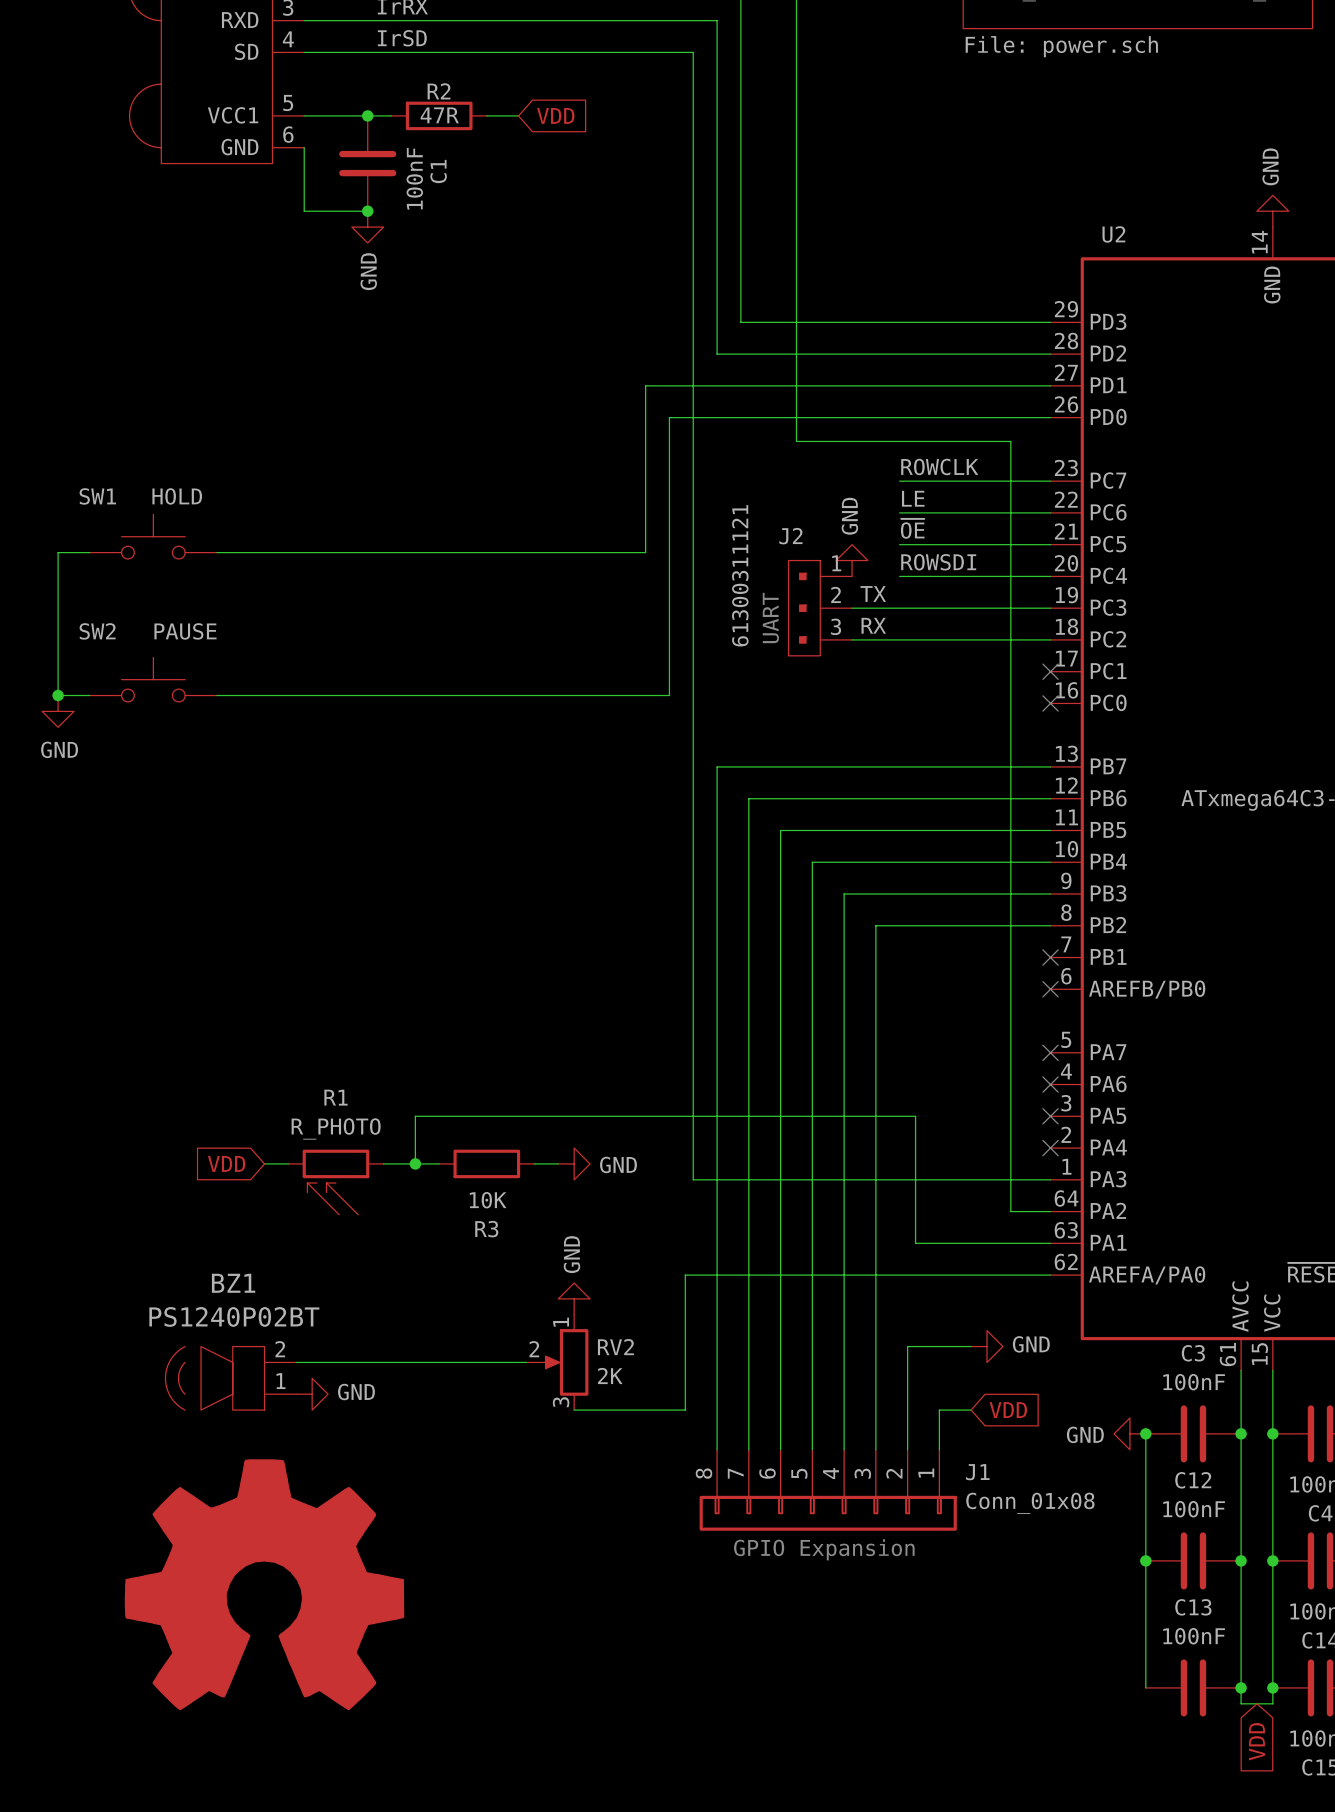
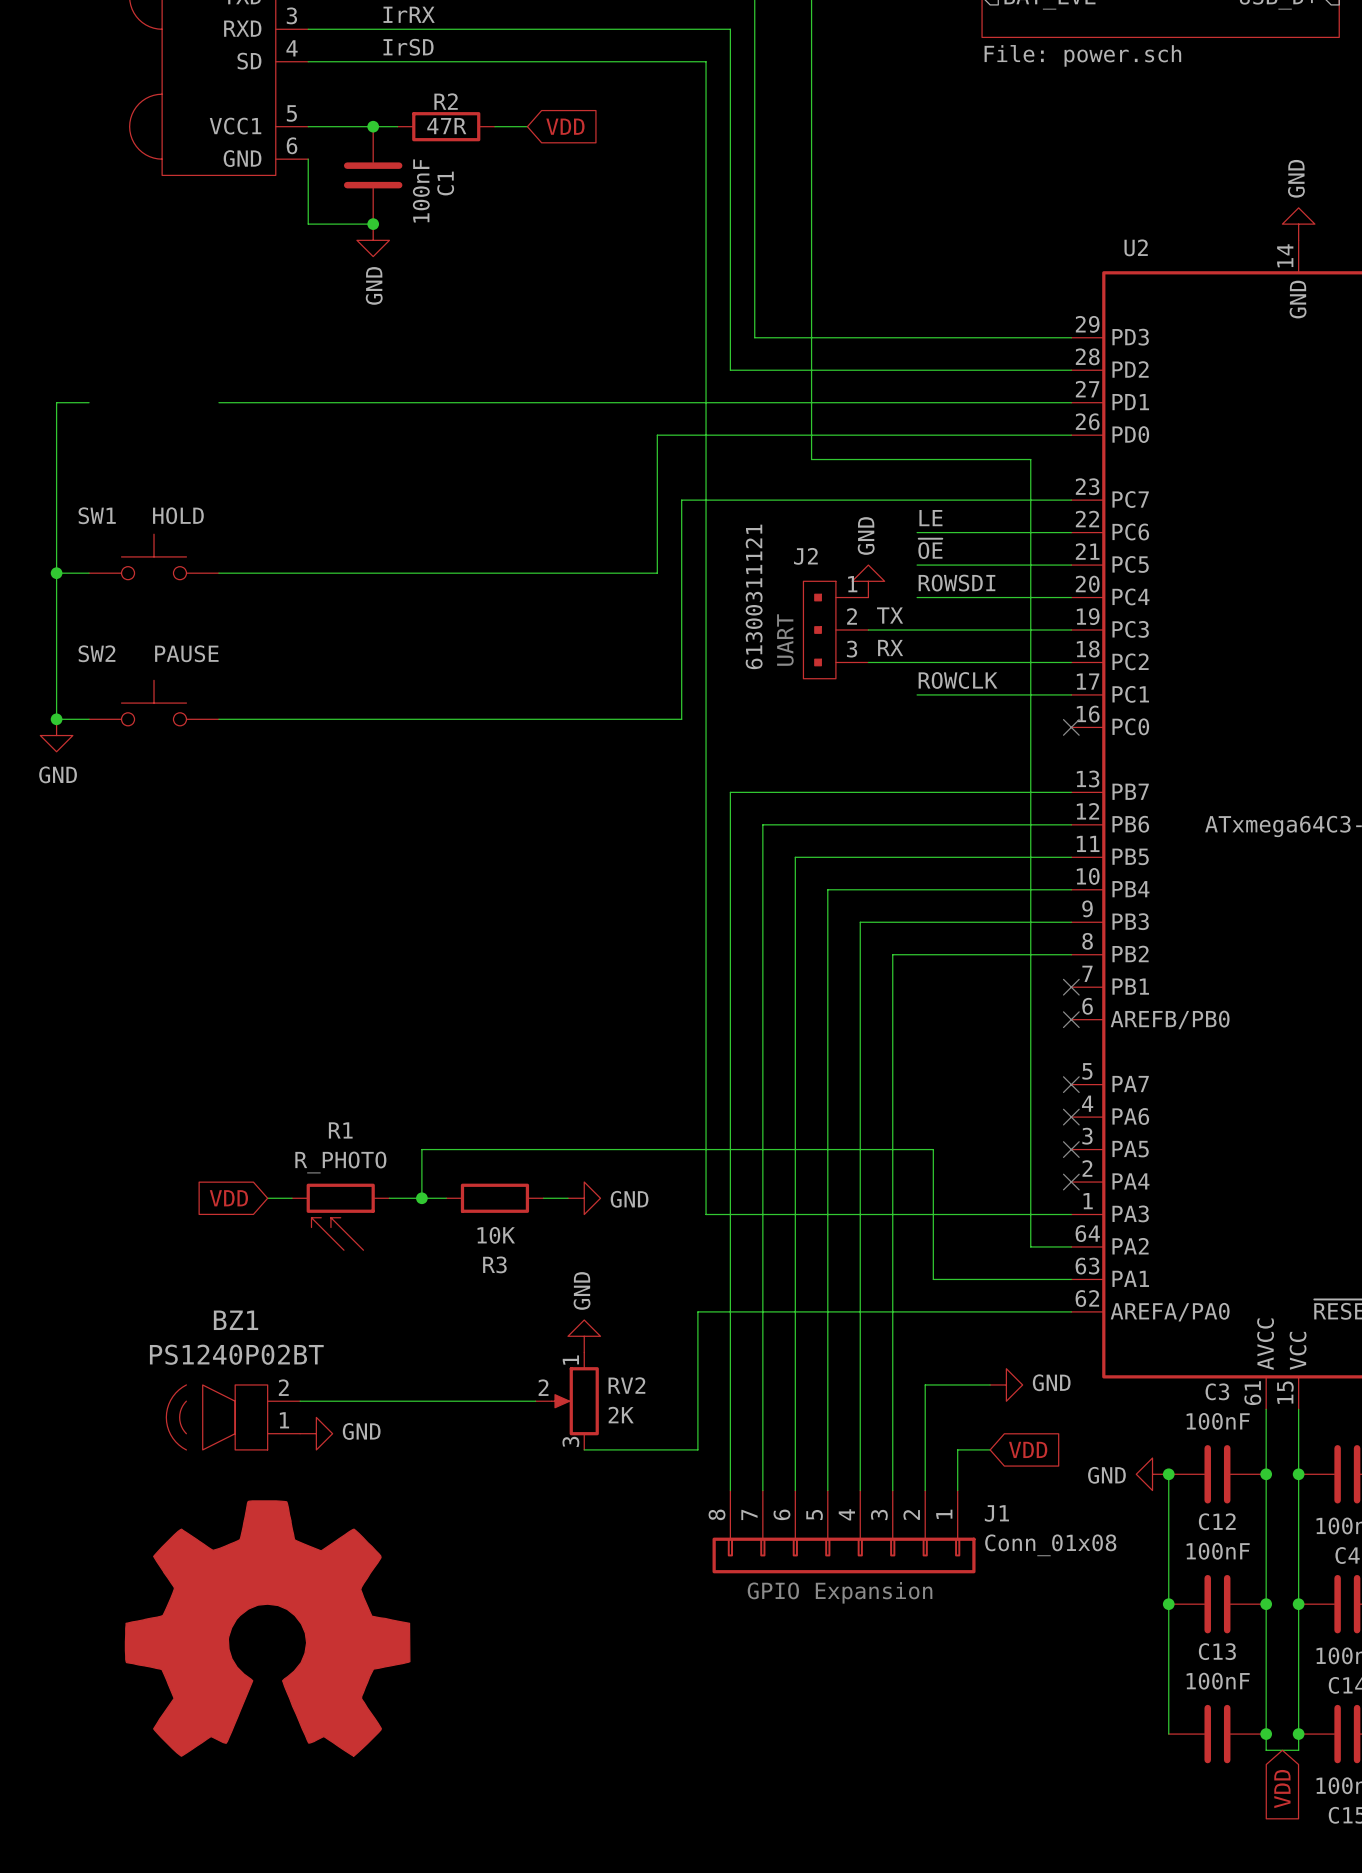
wire: none -> (89, 402) (56, 402) (56, 573)
wire: none -> (218, 402) (657, 402)
wire: (645, 385) (645, 417) -> (681, 435) (657, 435)
wire: (669, 417) (669, 481) -> (917, 500) (681, 500)
label position: ROWCLK (939, 466) -> ROWCLK (958, 680)
junction: none -> (56, 573)
wire: none -> (917, 694) (1071, 694)
no-connect mark: (1050, 671) -> none

